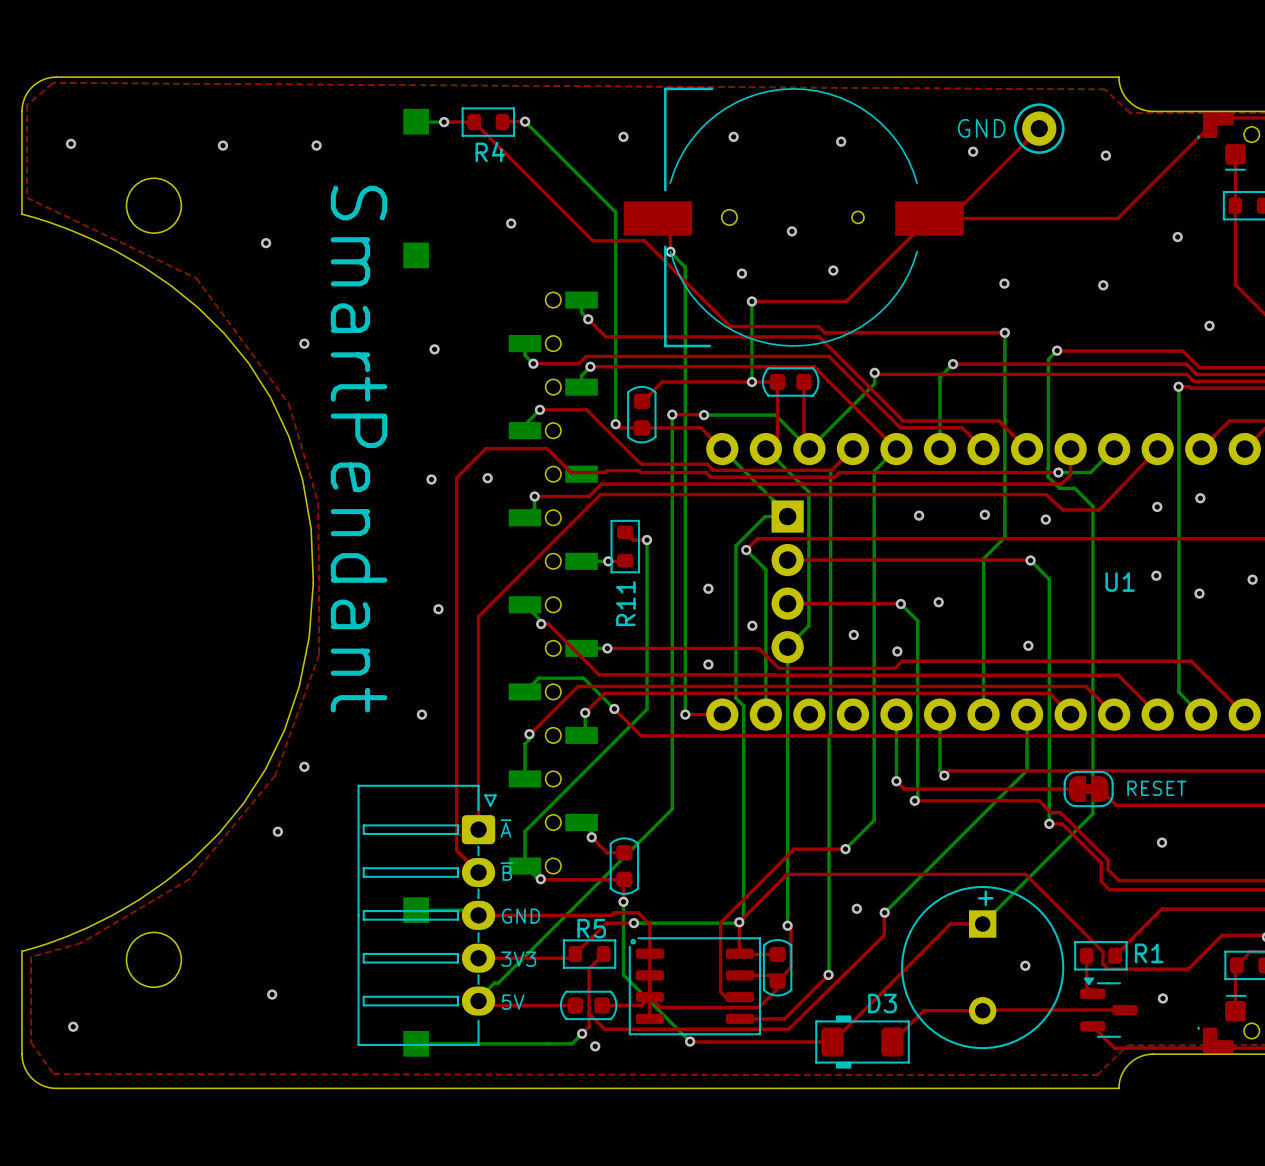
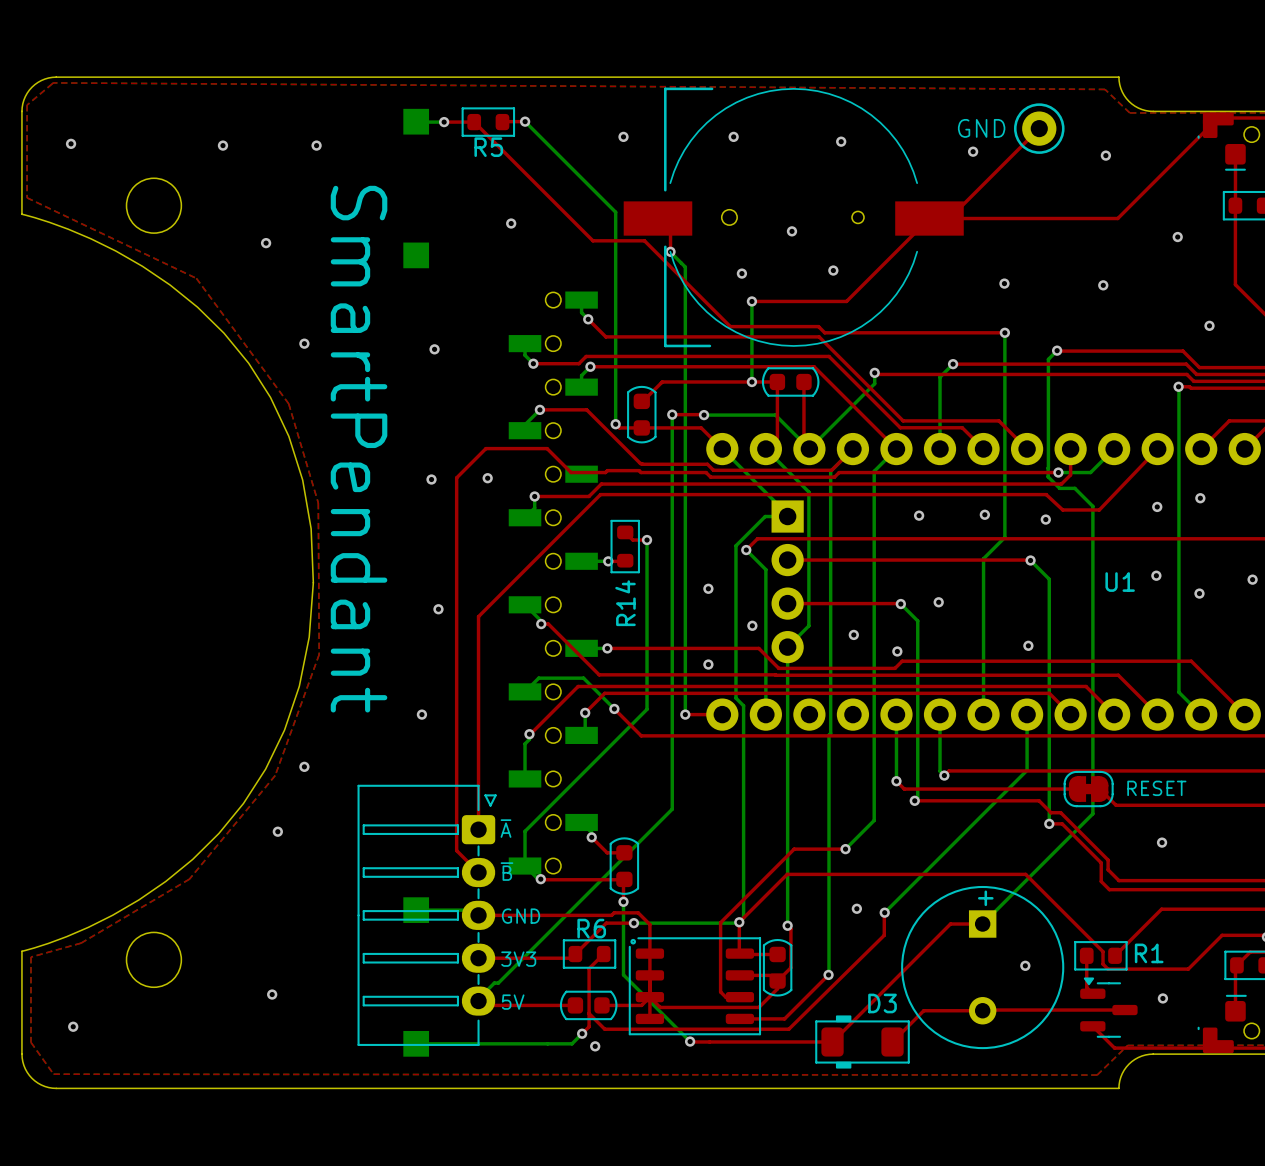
R4 name: R4 (490, 151) -> R5 (488, 147)
R11 name: R11 (625, 603) -> R14 (625, 603)
R5 name: R5 (591, 928) -> R6 (591, 928)

